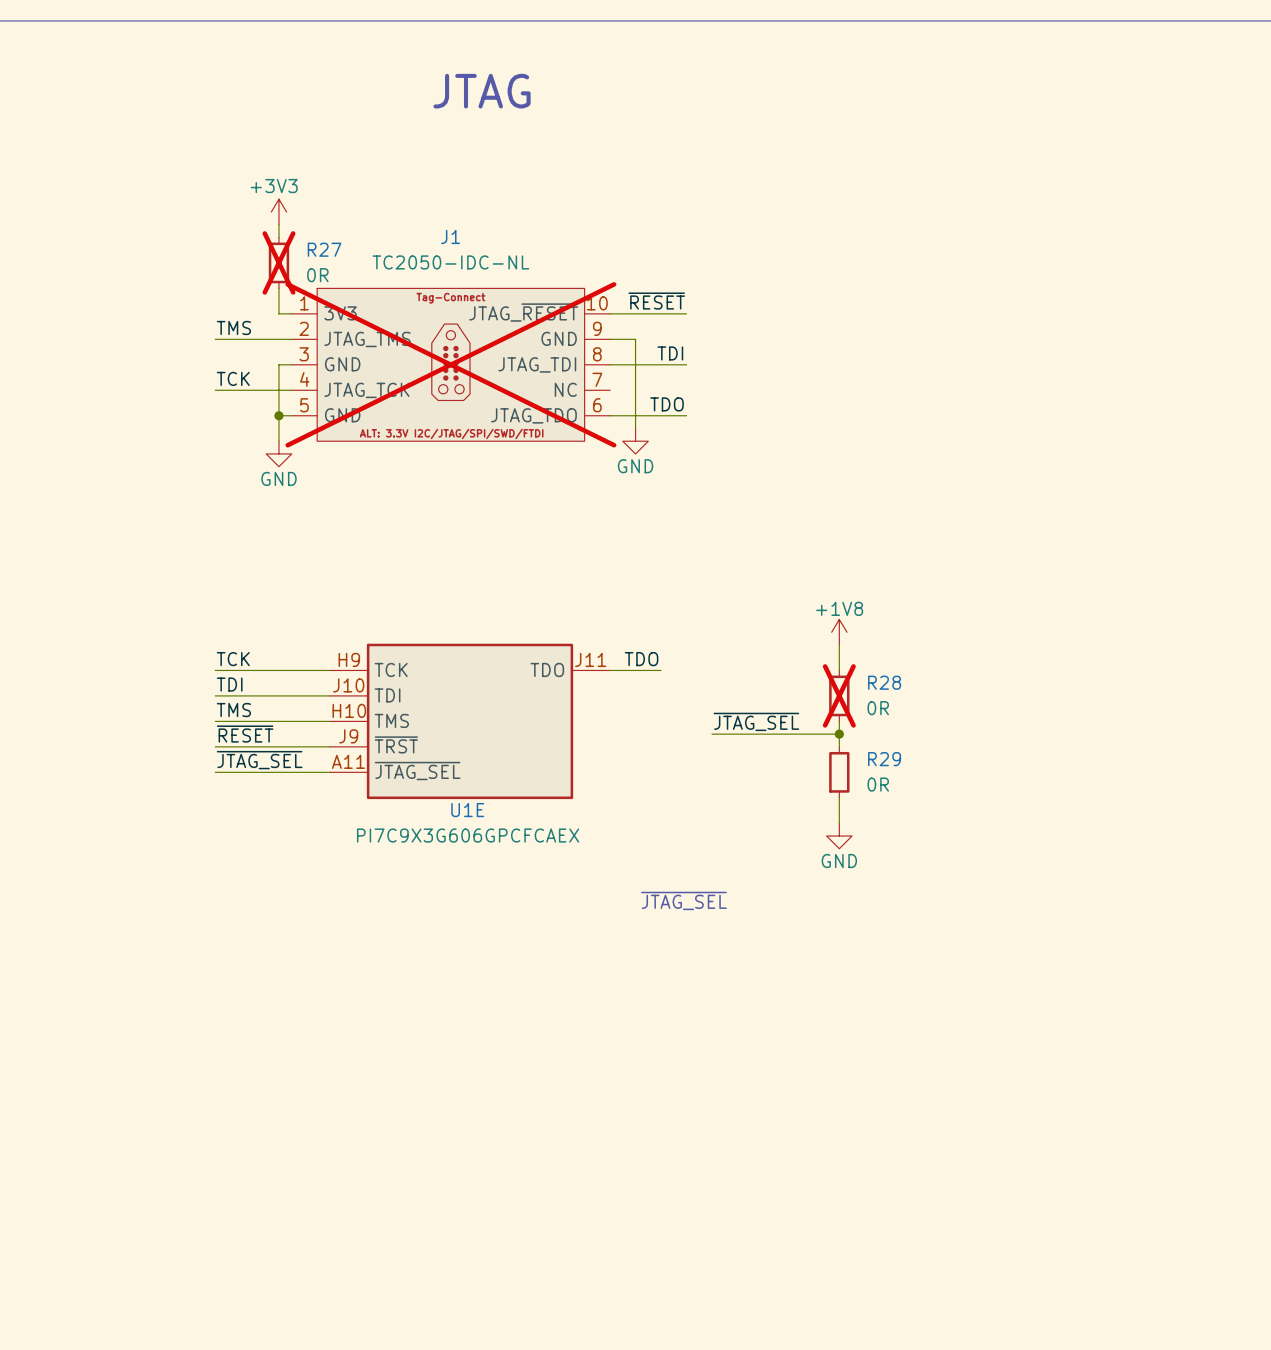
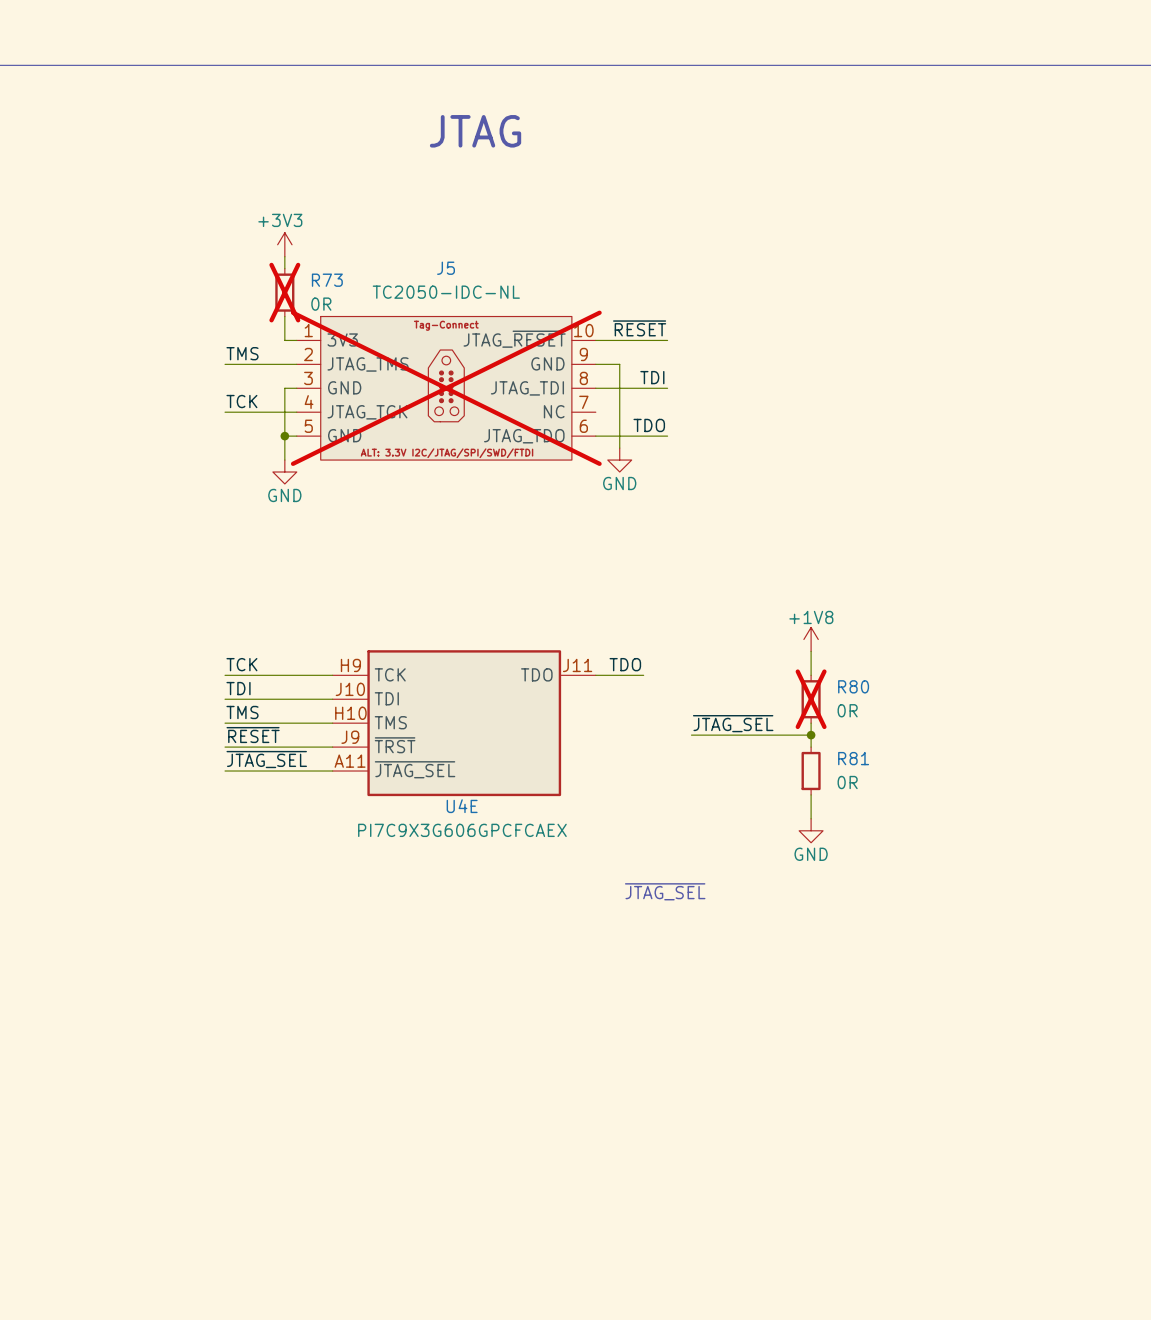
J1 name: J1 (450, 236) -> J5 (446, 268)
R27 name: R27 (324, 249) -> R73 (327, 280)
R28 name: R28 (884, 682) -> R80 (853, 686)
R29 name: R29 (884, 759) -> R81 (853, 758)
U1E name: U1E (467, 810) -> U4E (462, 806)

